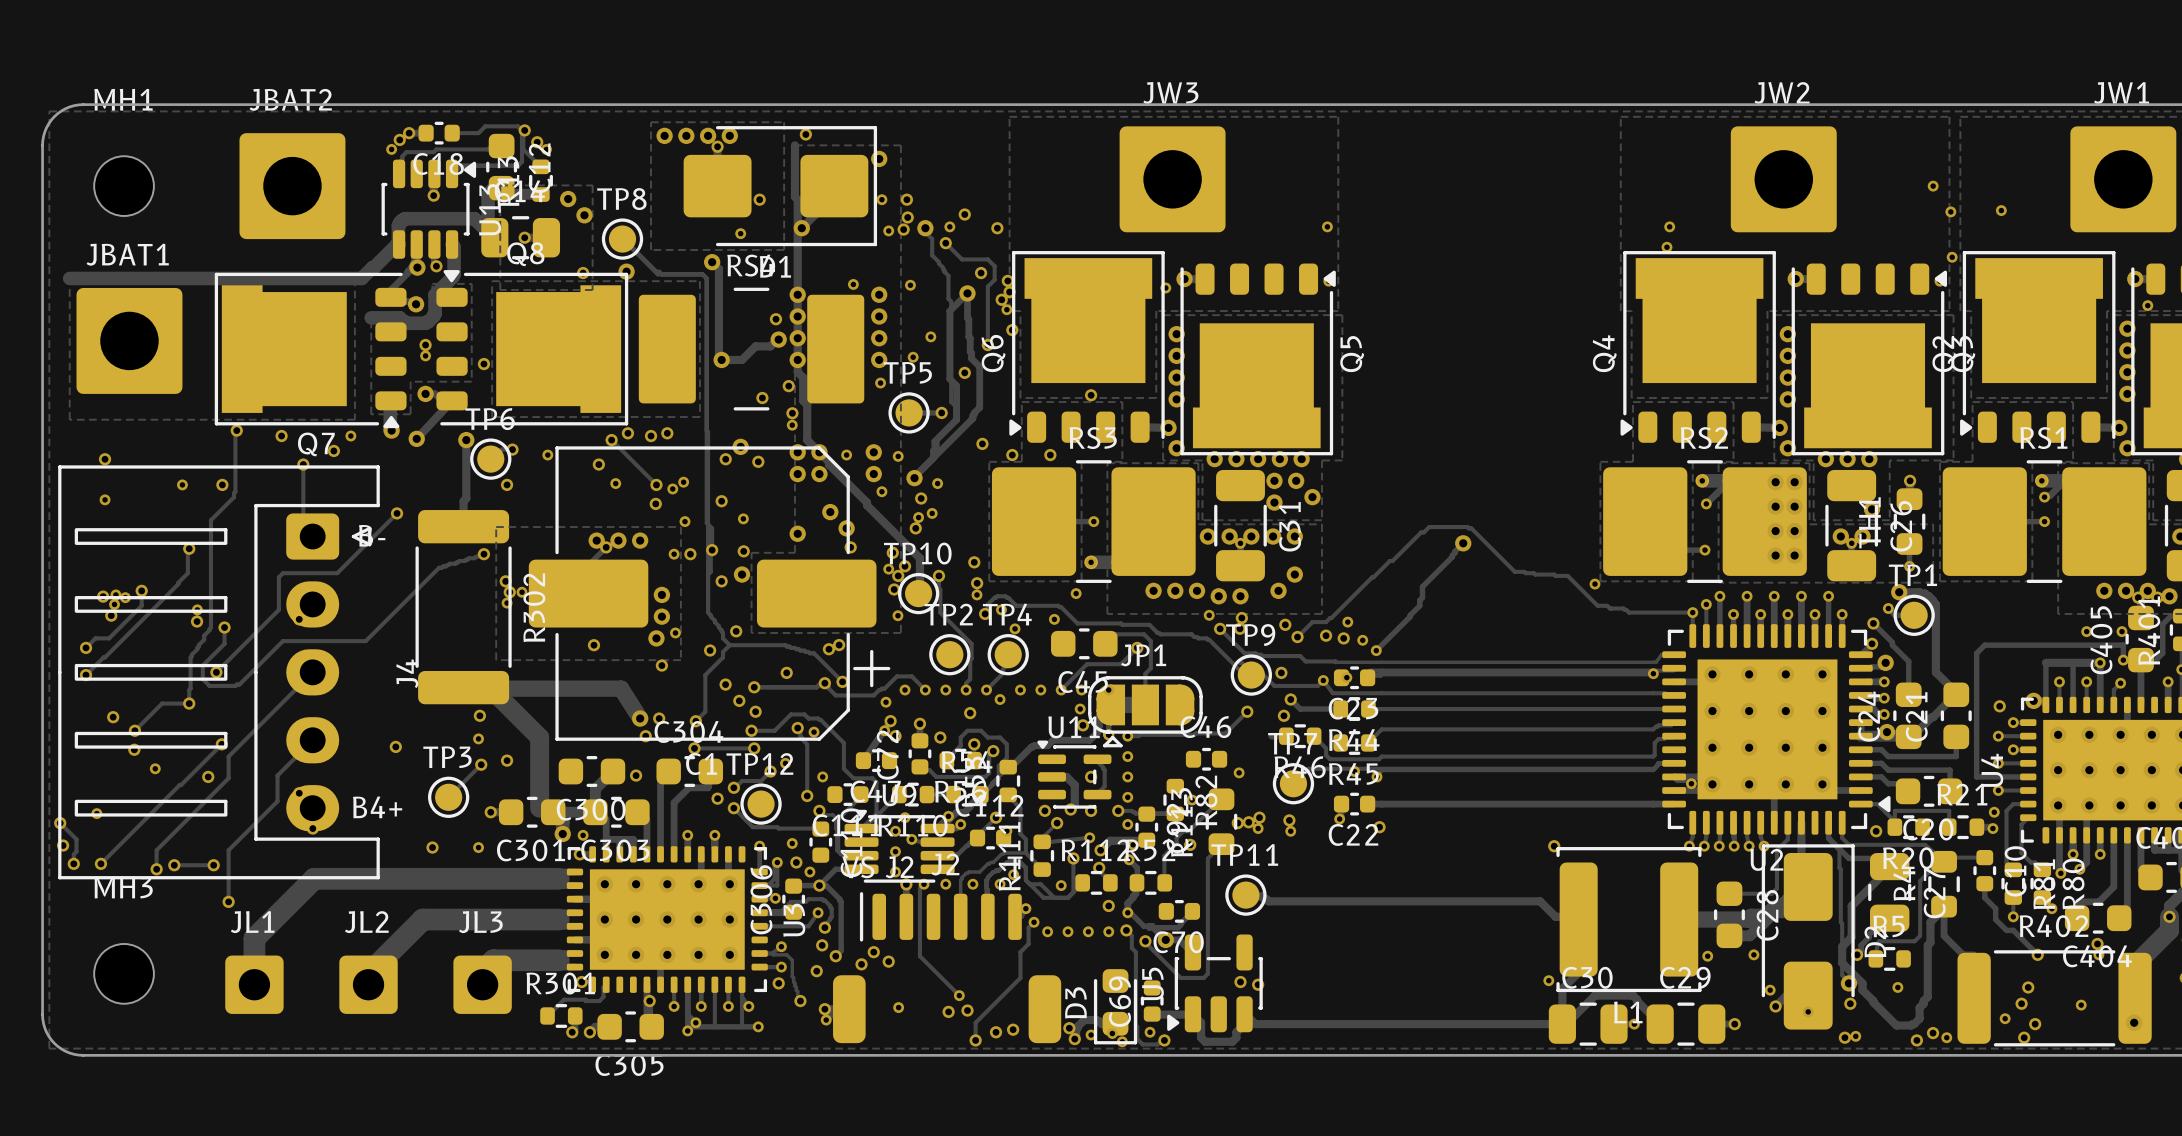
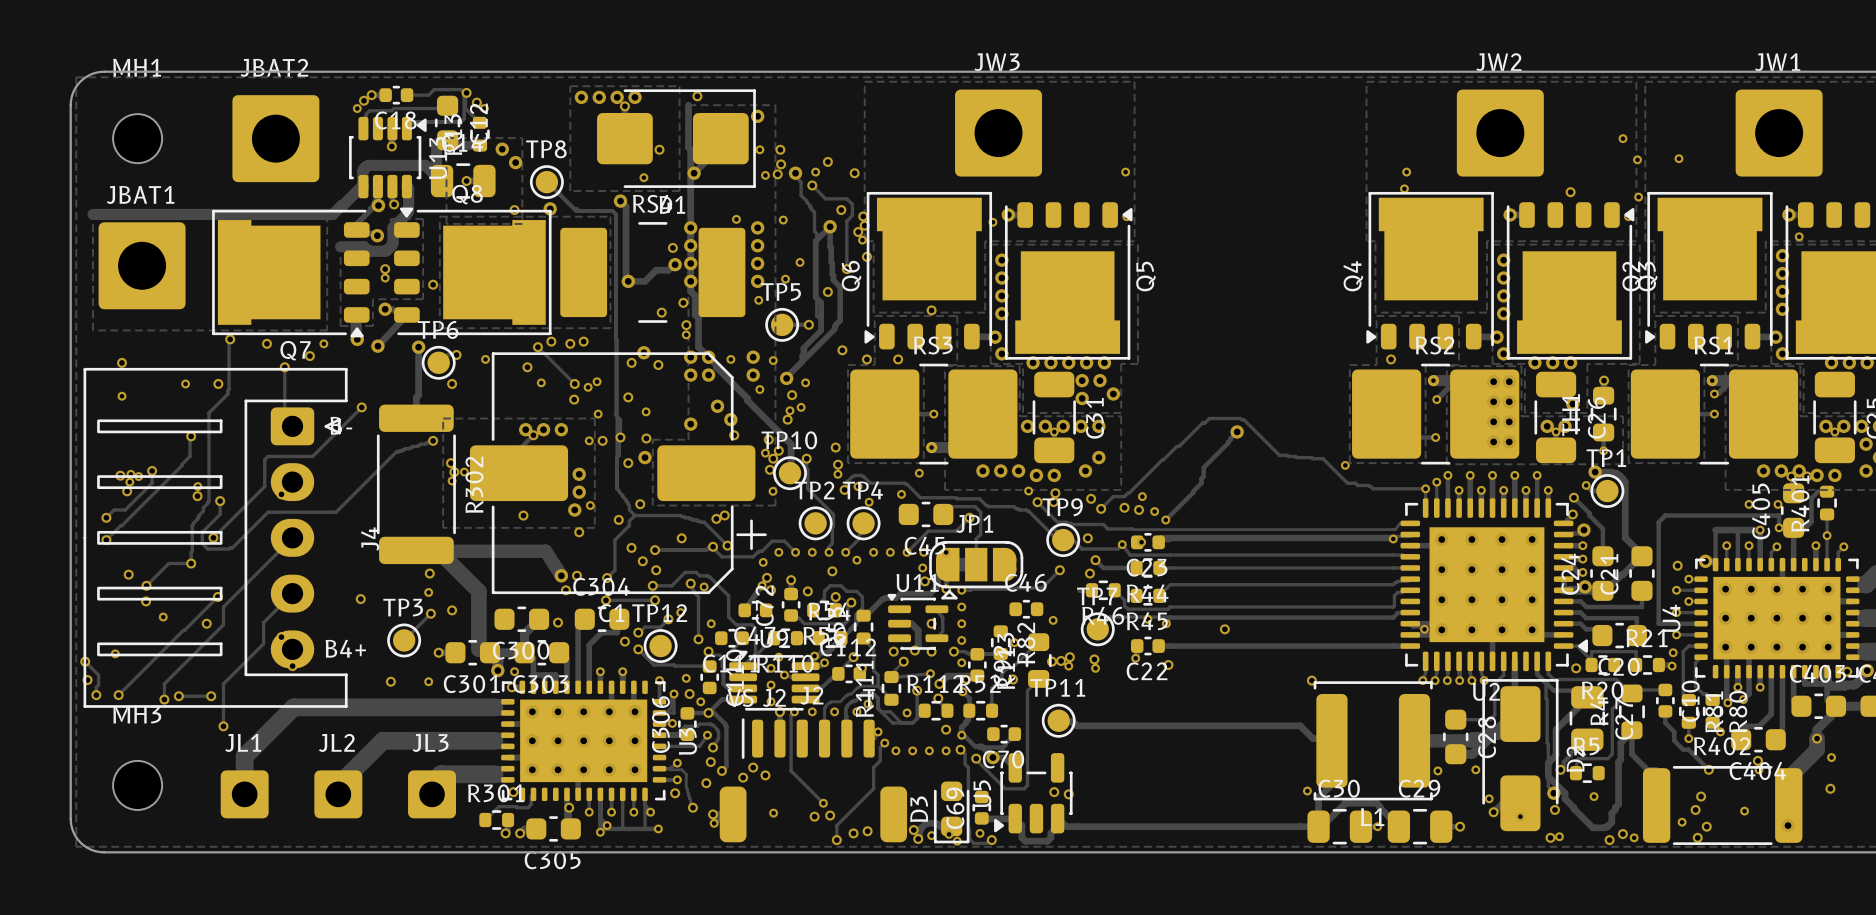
via: none -> (1570, 192)
via: none -> (1391, 359)
via: none -> (1224, 629)

